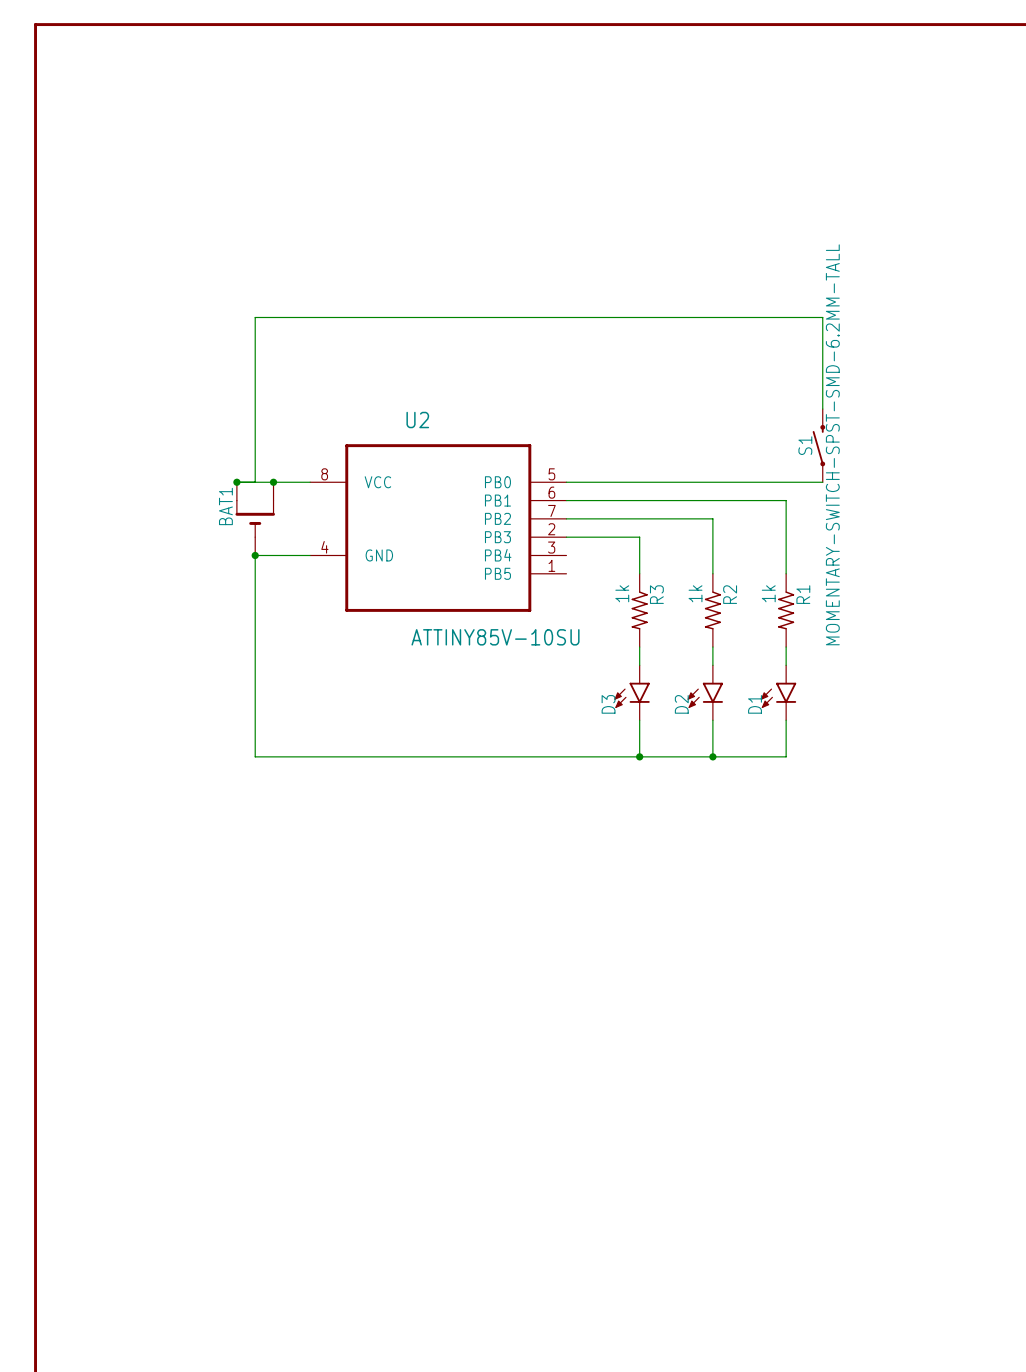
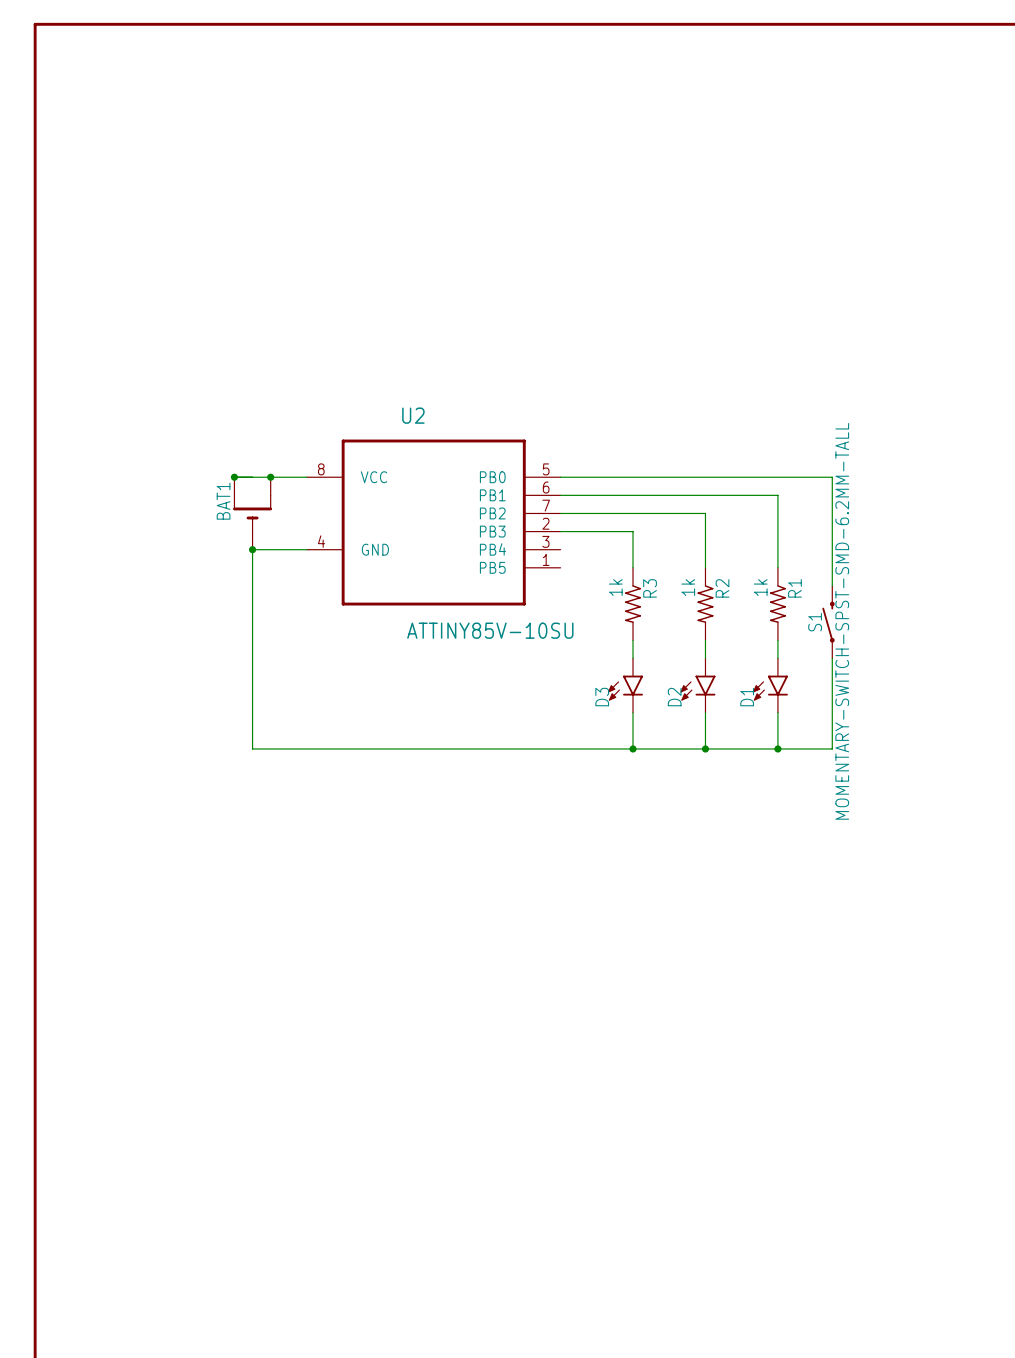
wire: (822, 409) (822, 317) (255, 317) (255, 482) -> none
S1 position: (818, 445) -> (828, 622)
wire: none -> (814, 477) (832, 477) (832, 585)
wire: none -> (832, 658) (832, 748) (777, 748)
junction: none -> (777, 748)

